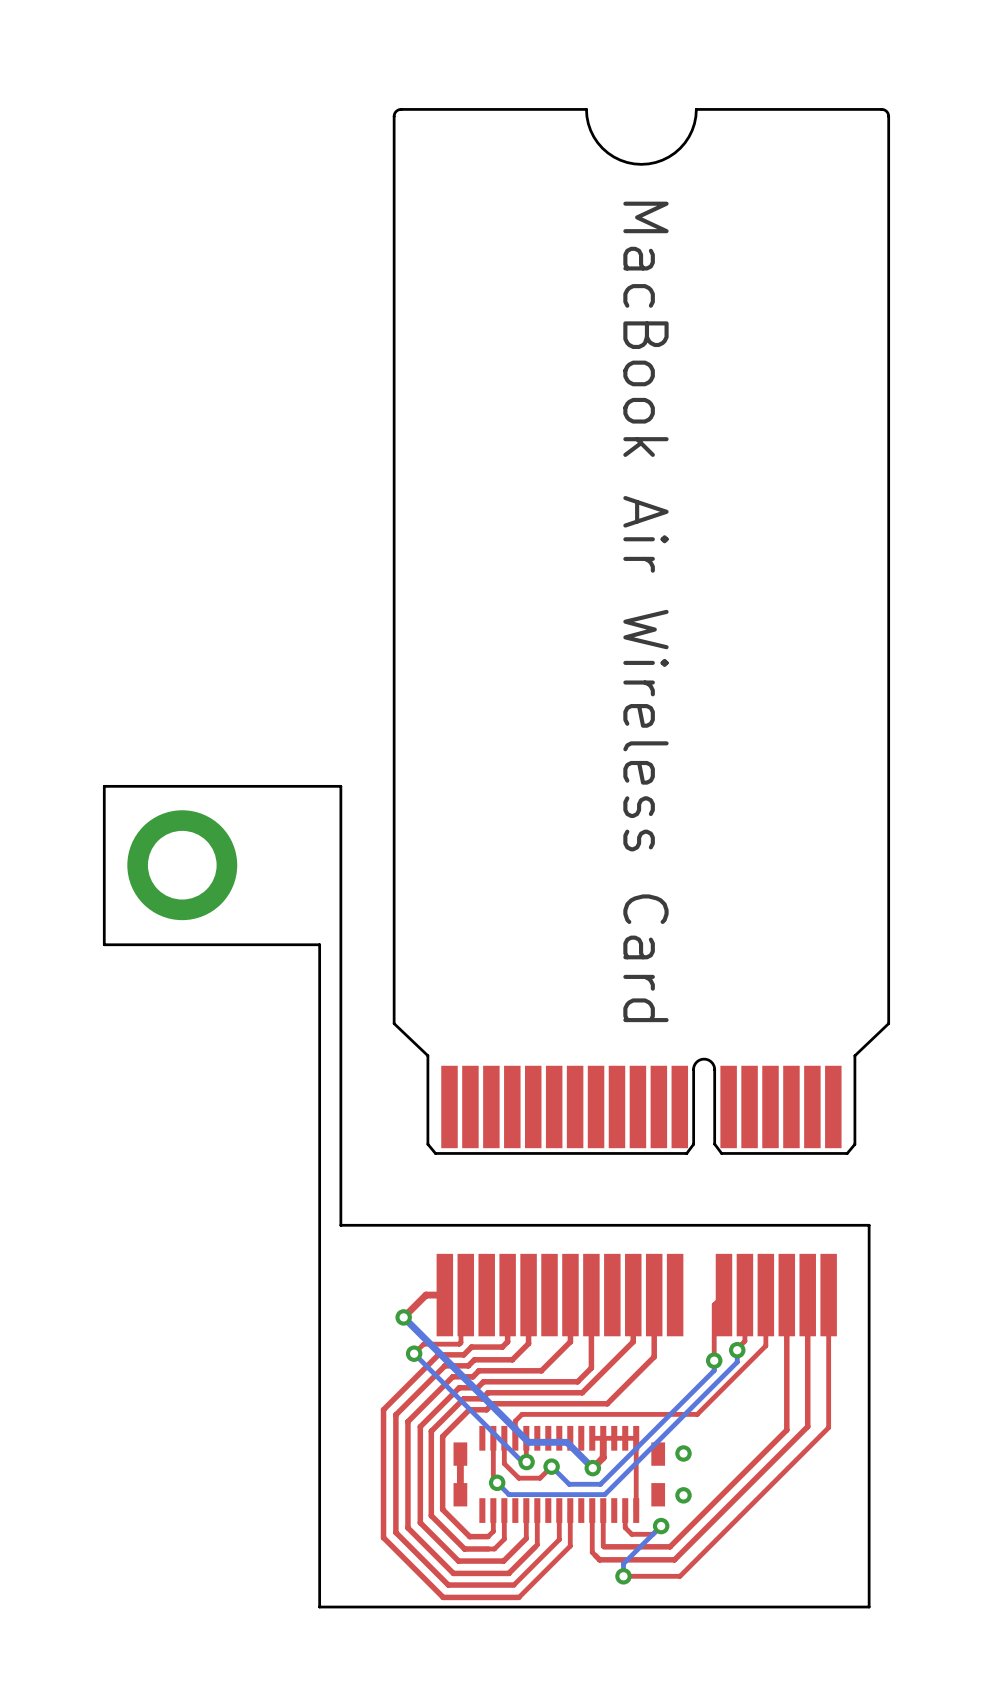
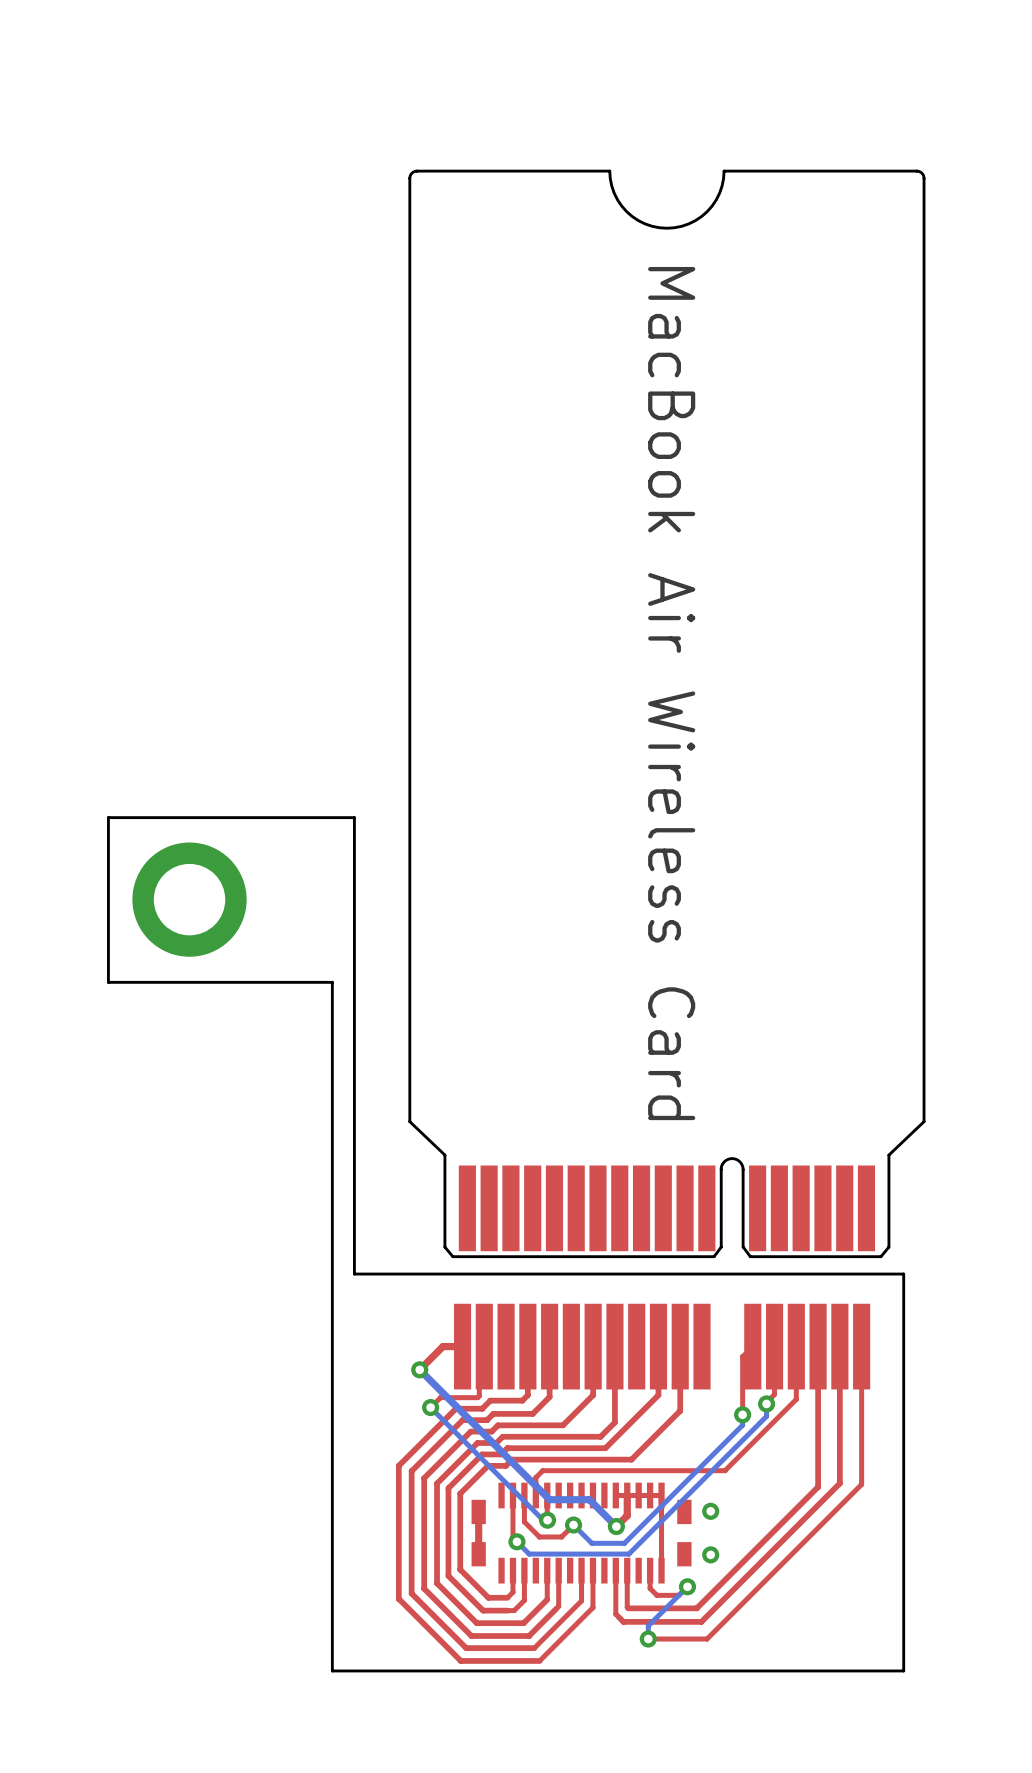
part position: (641, 631) -> (666, 713)

